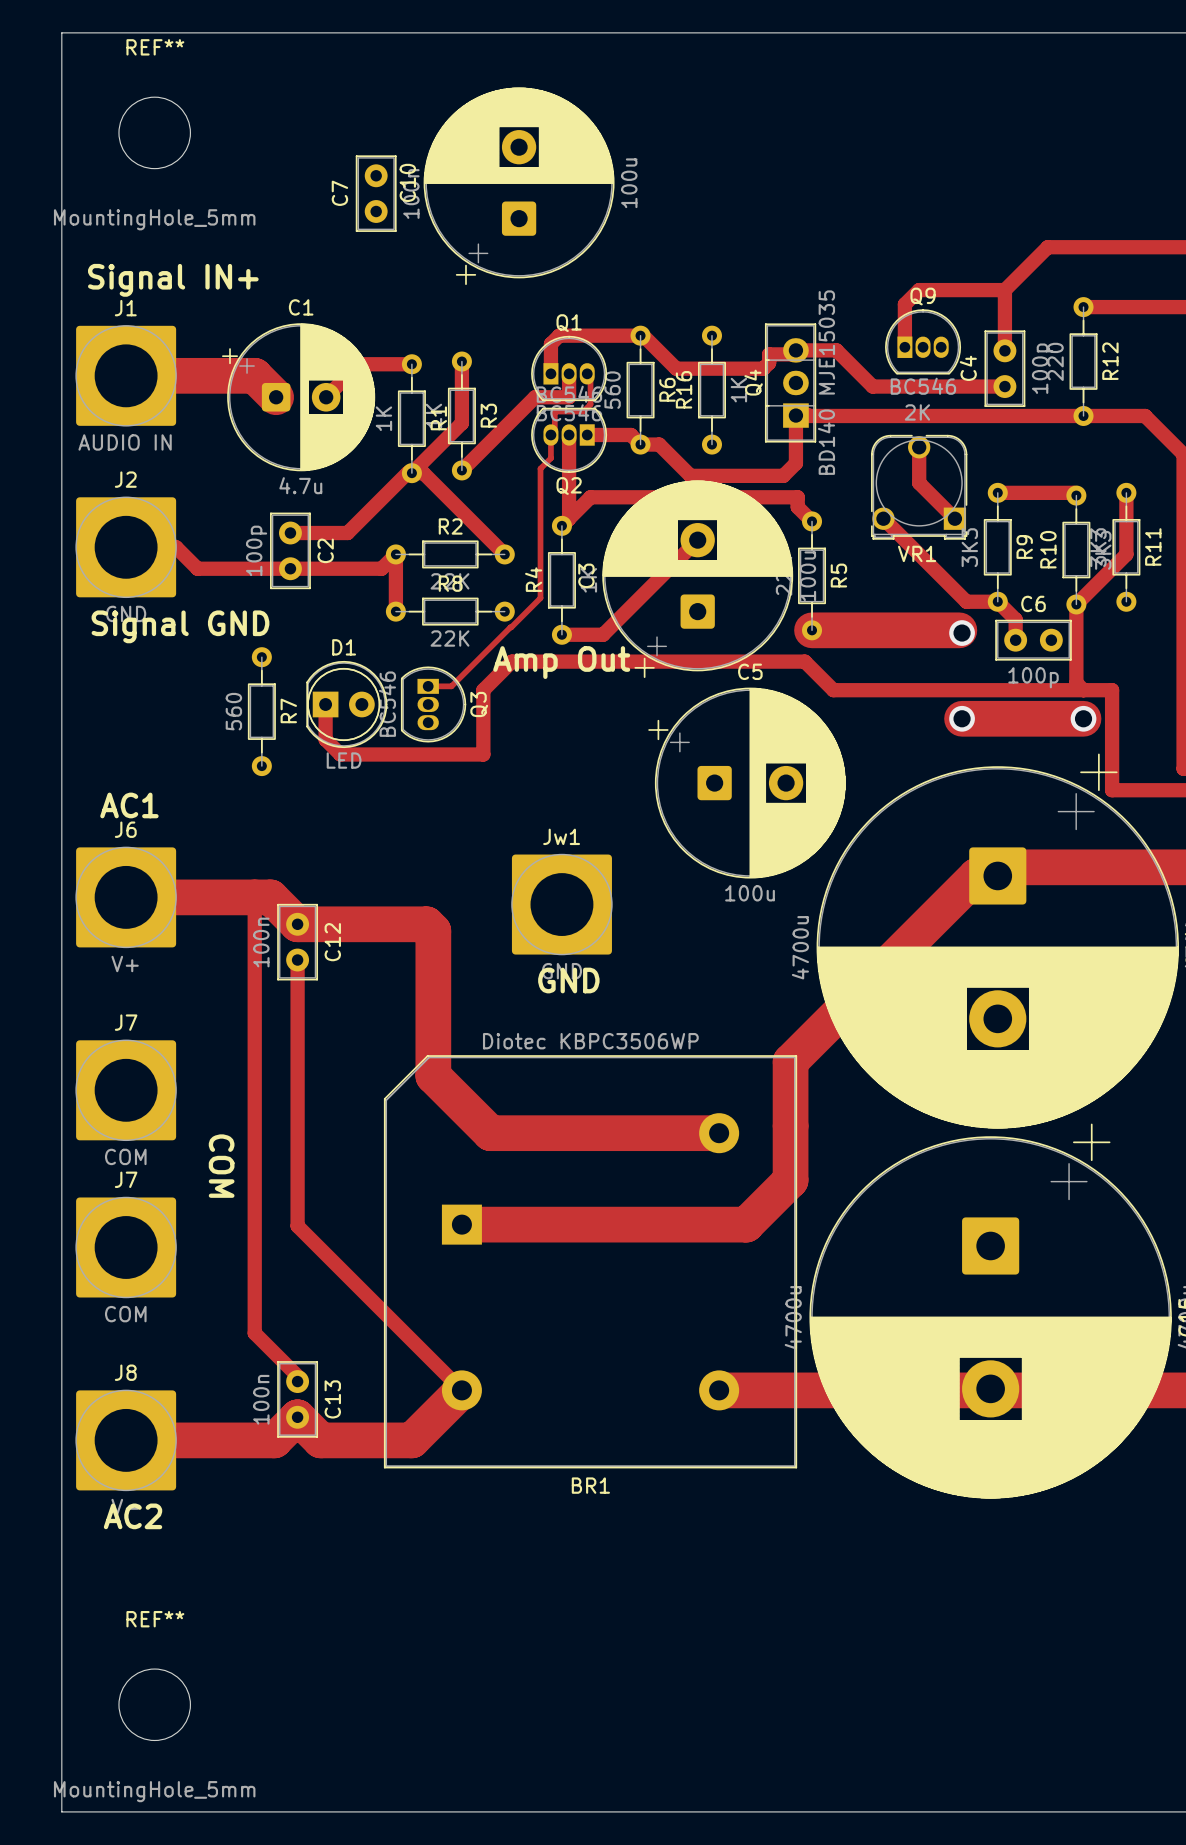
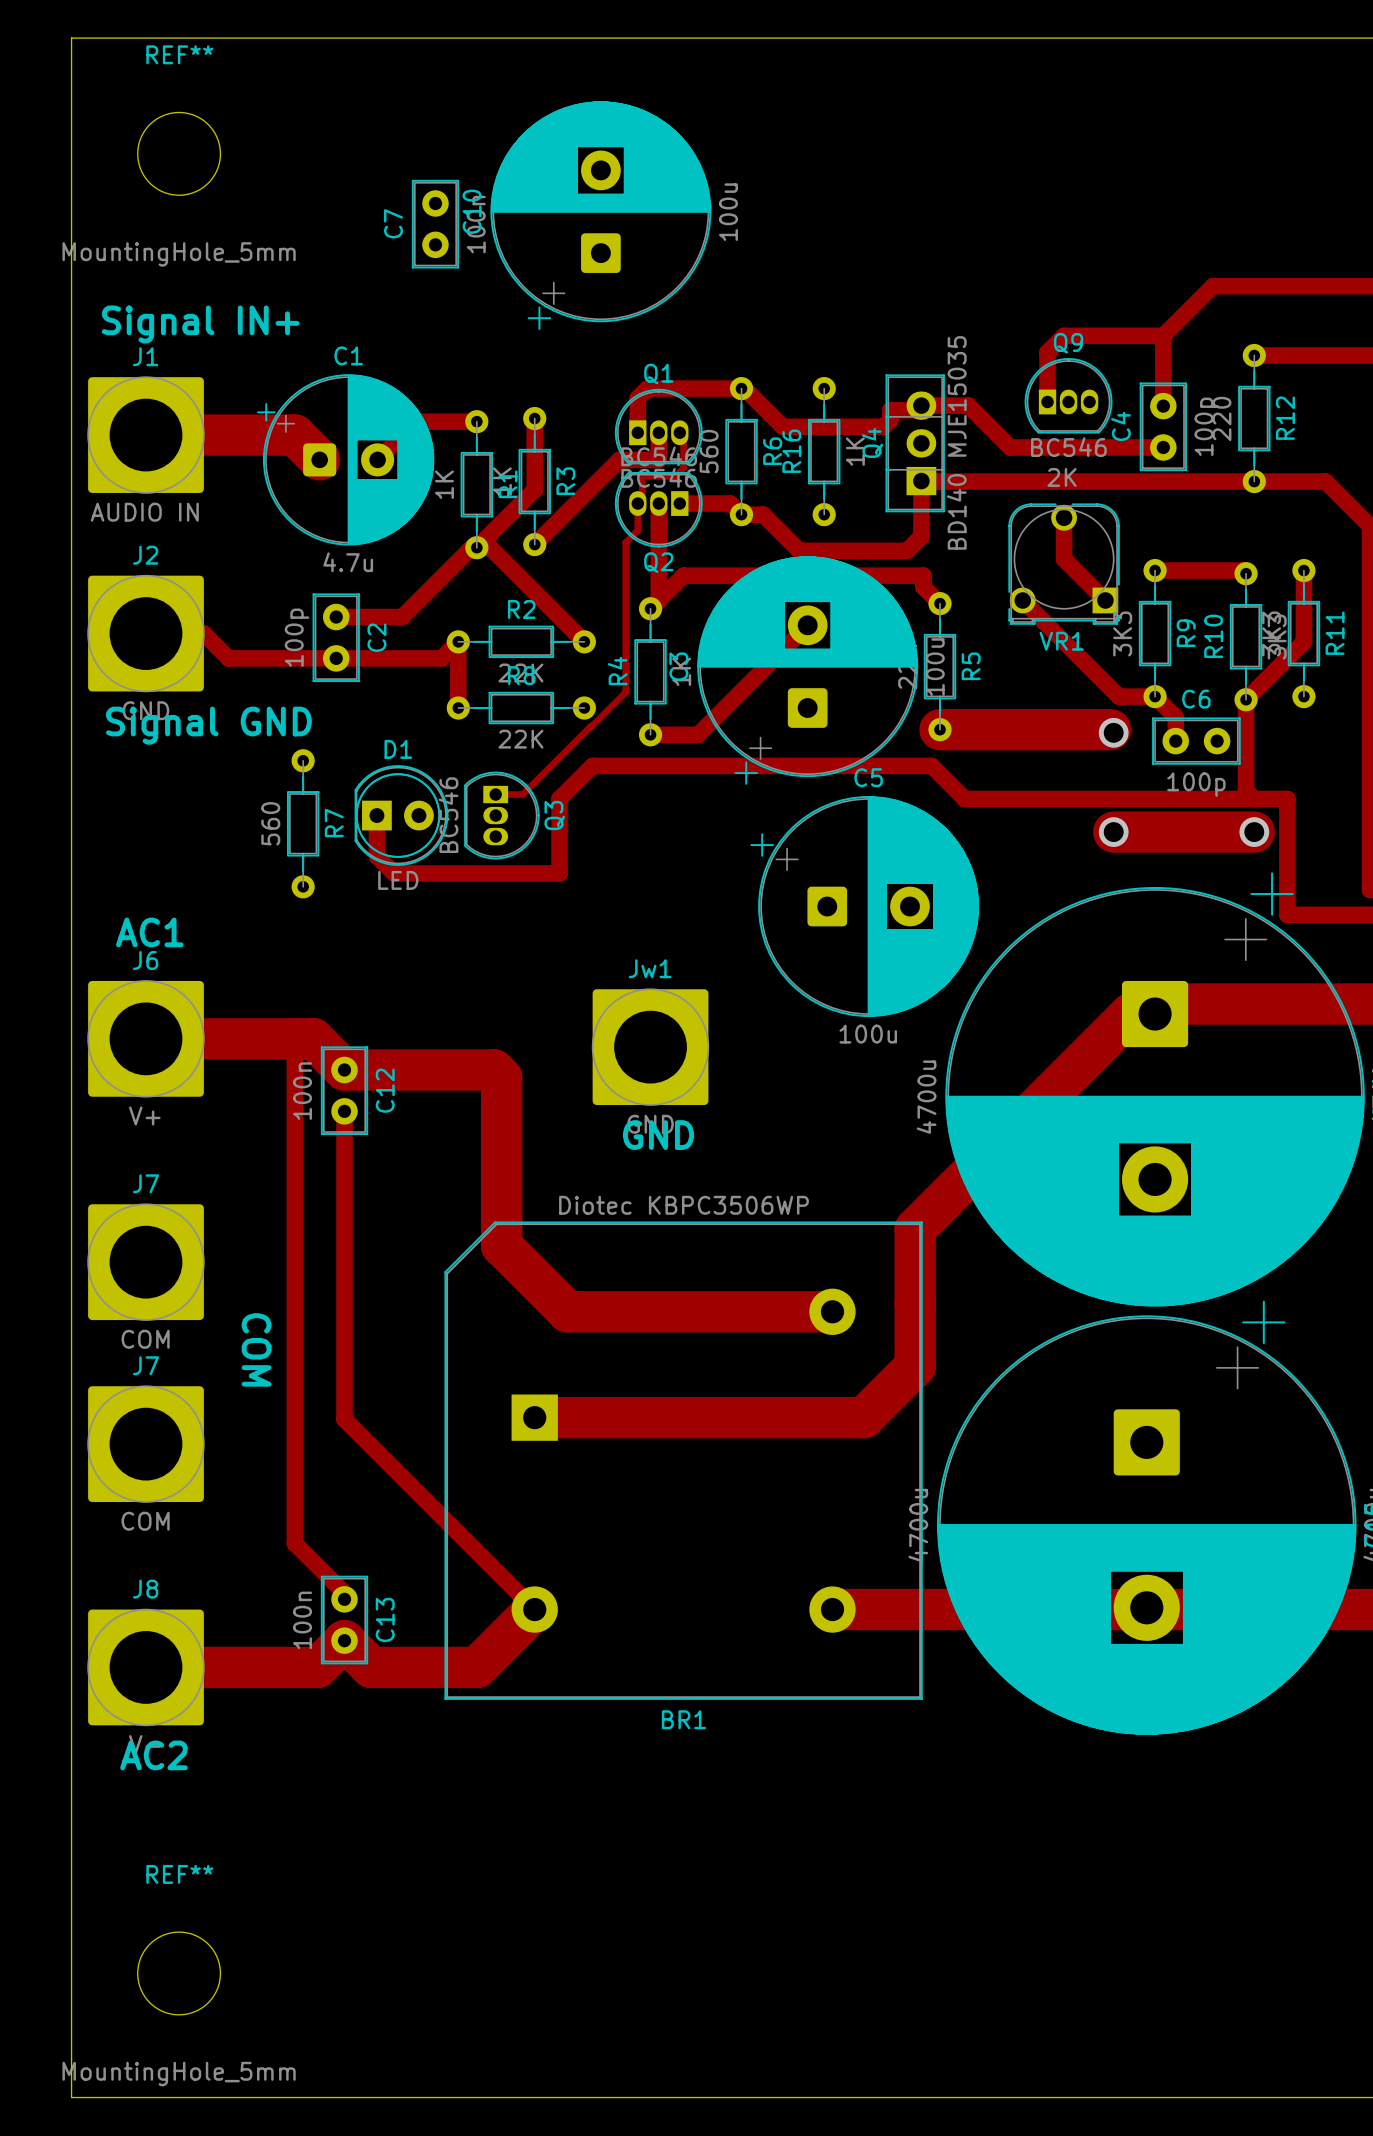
text: Amp Out (561, 662) -> none

